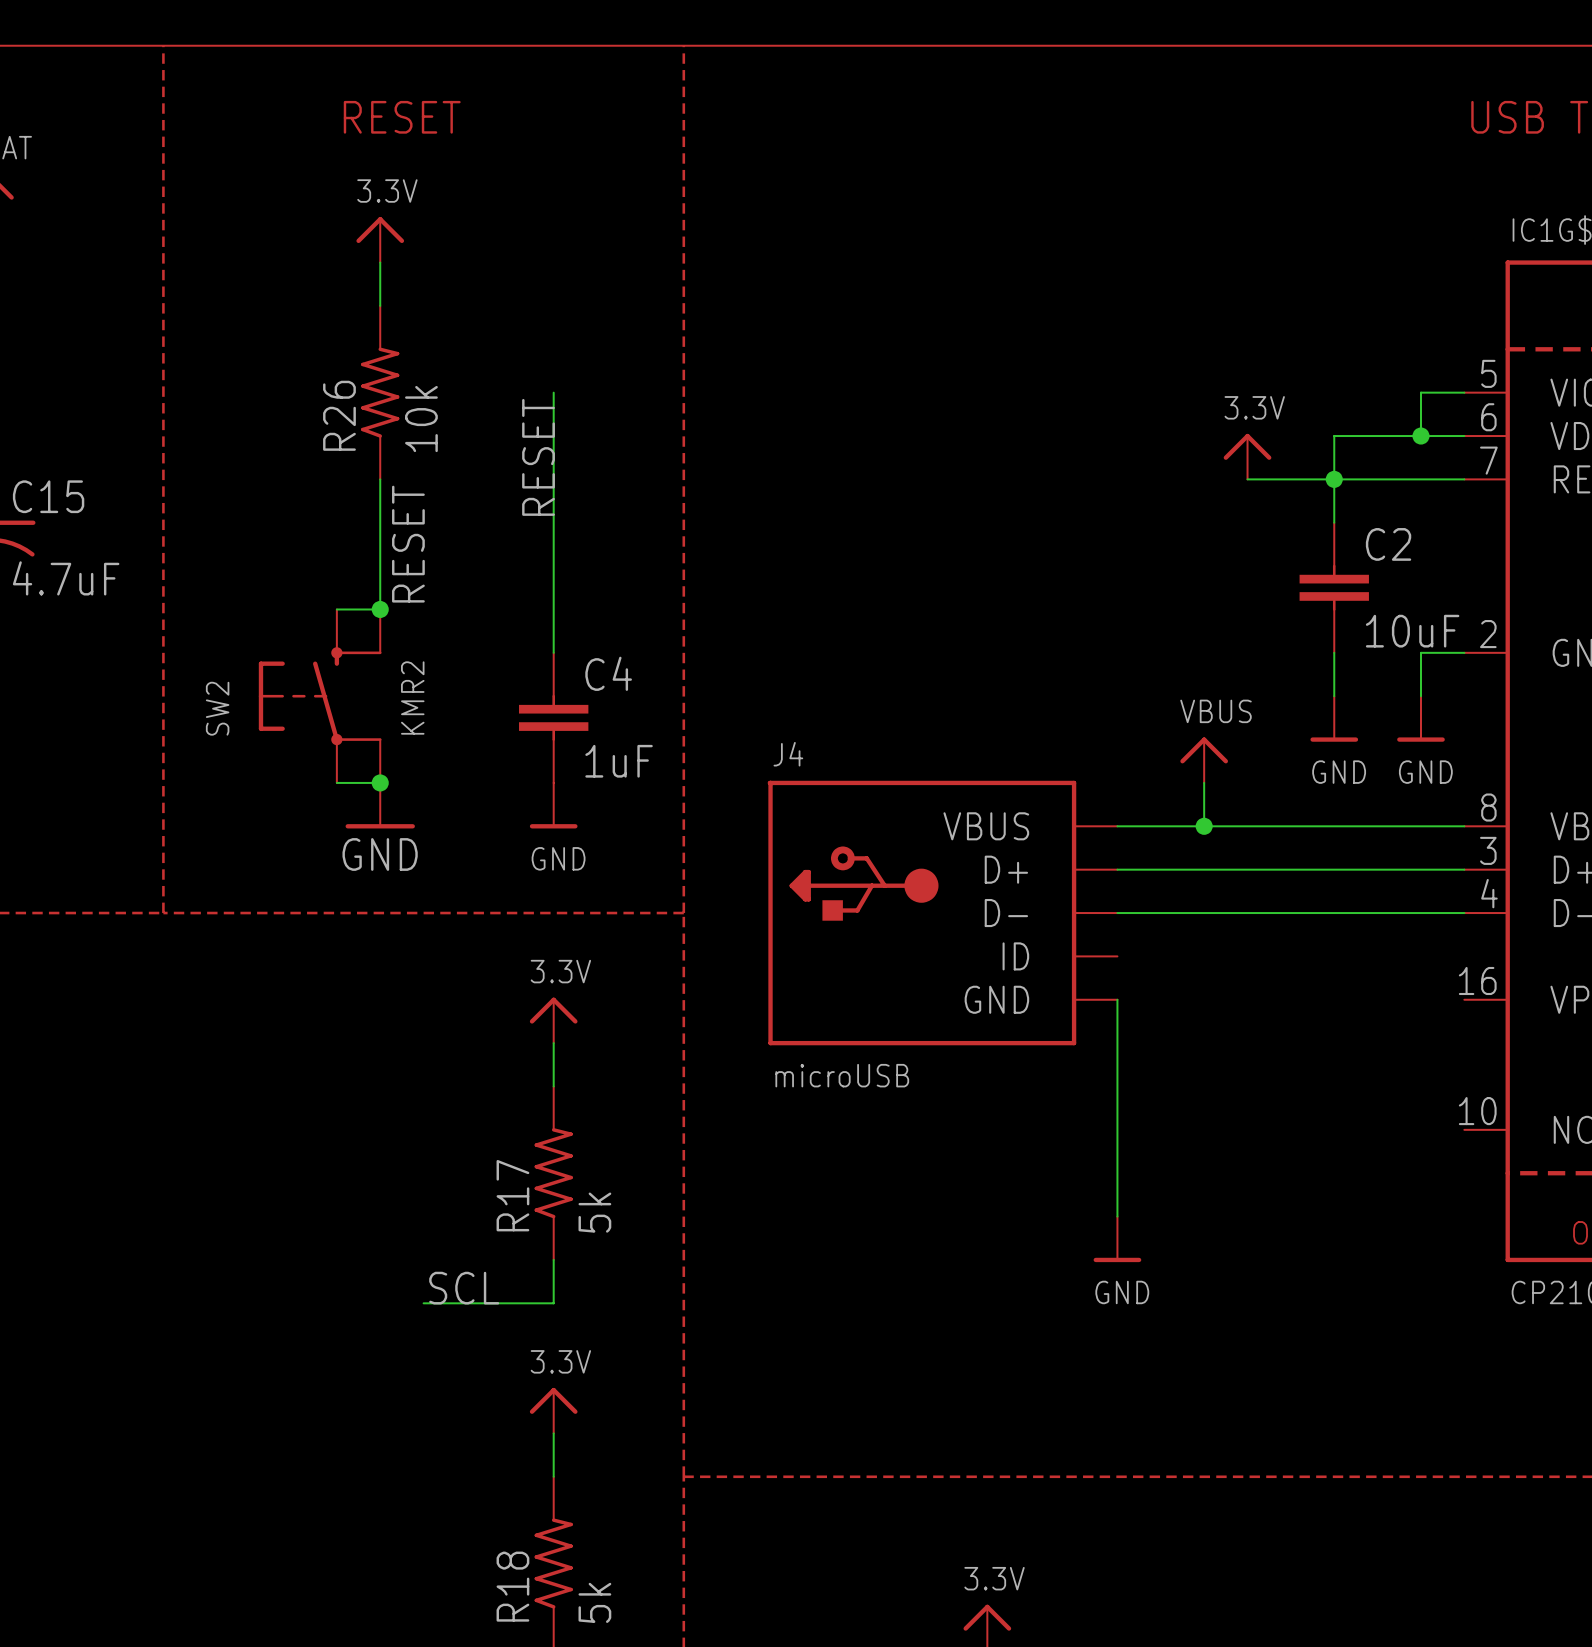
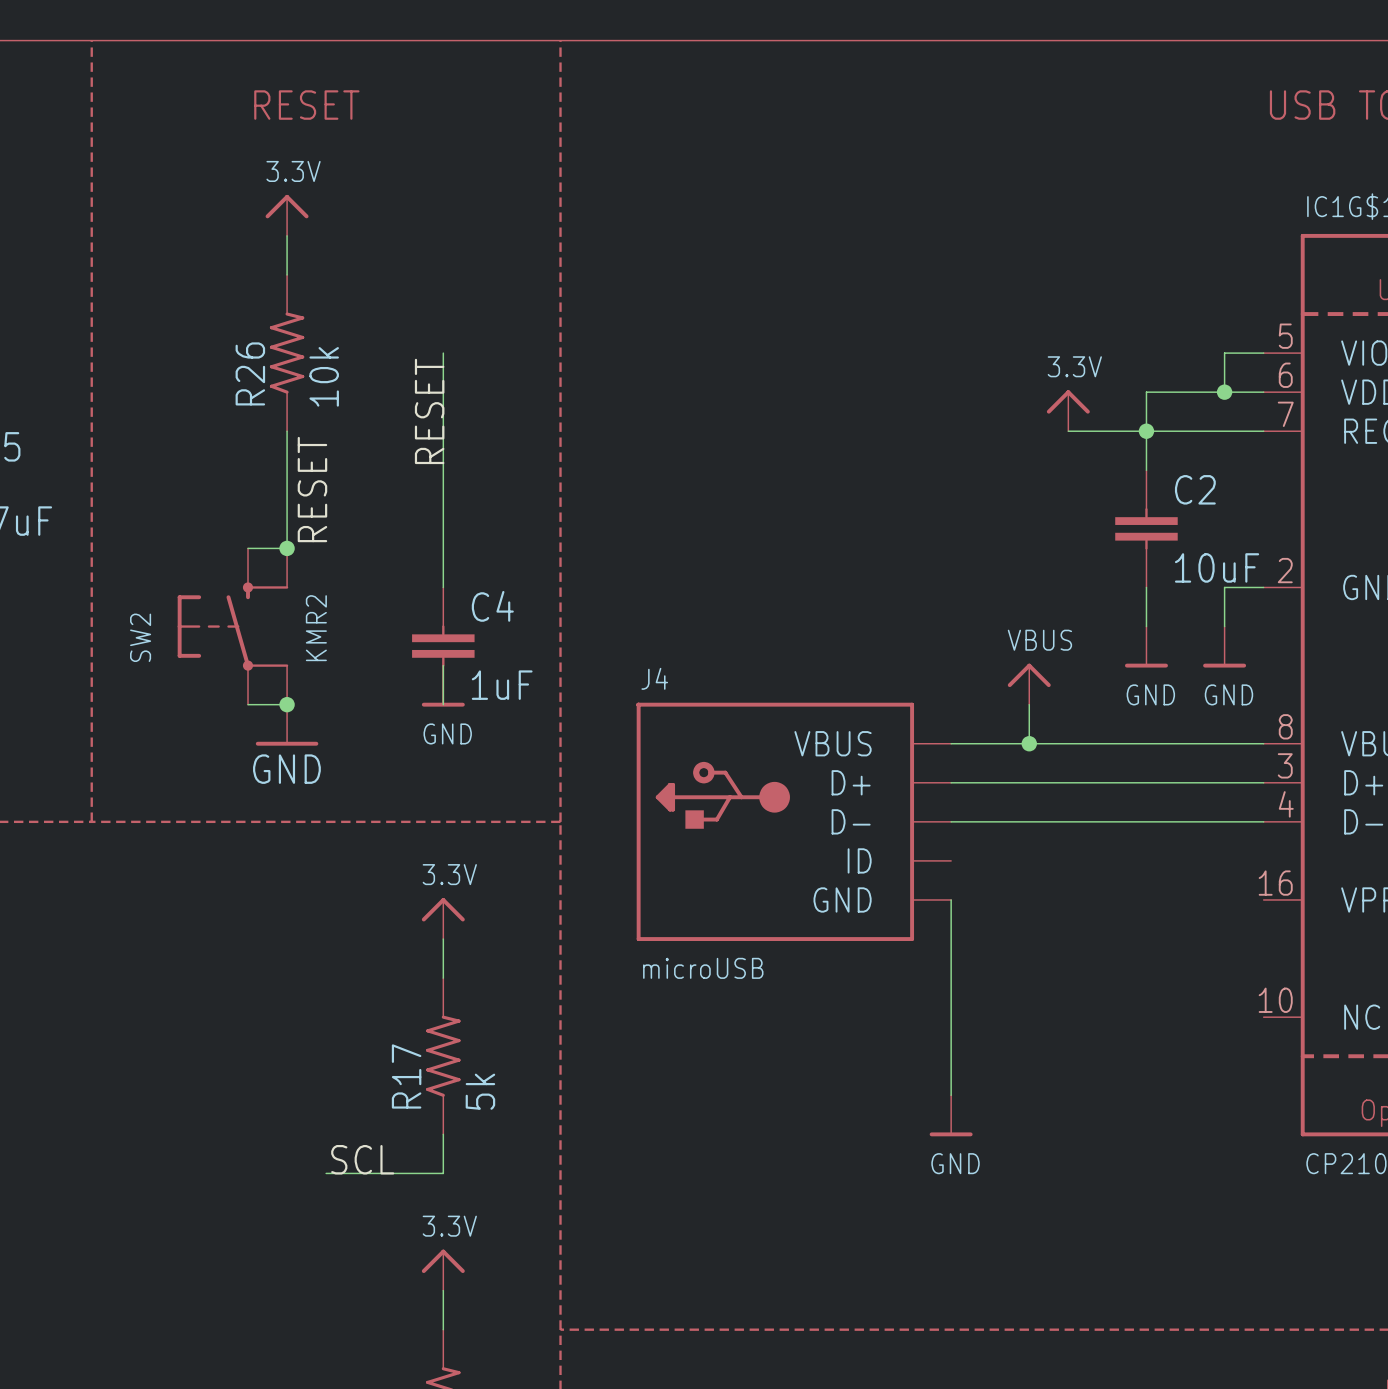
power symbol position: GND (553, 805) -> GND (443, 686)

